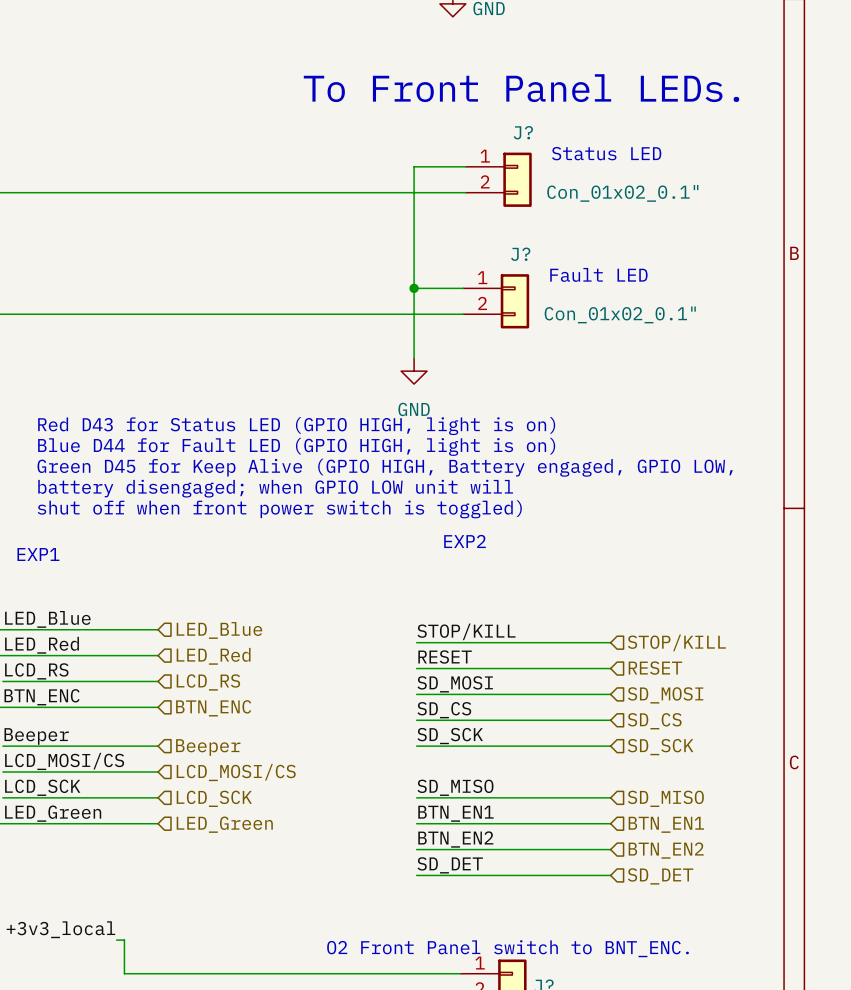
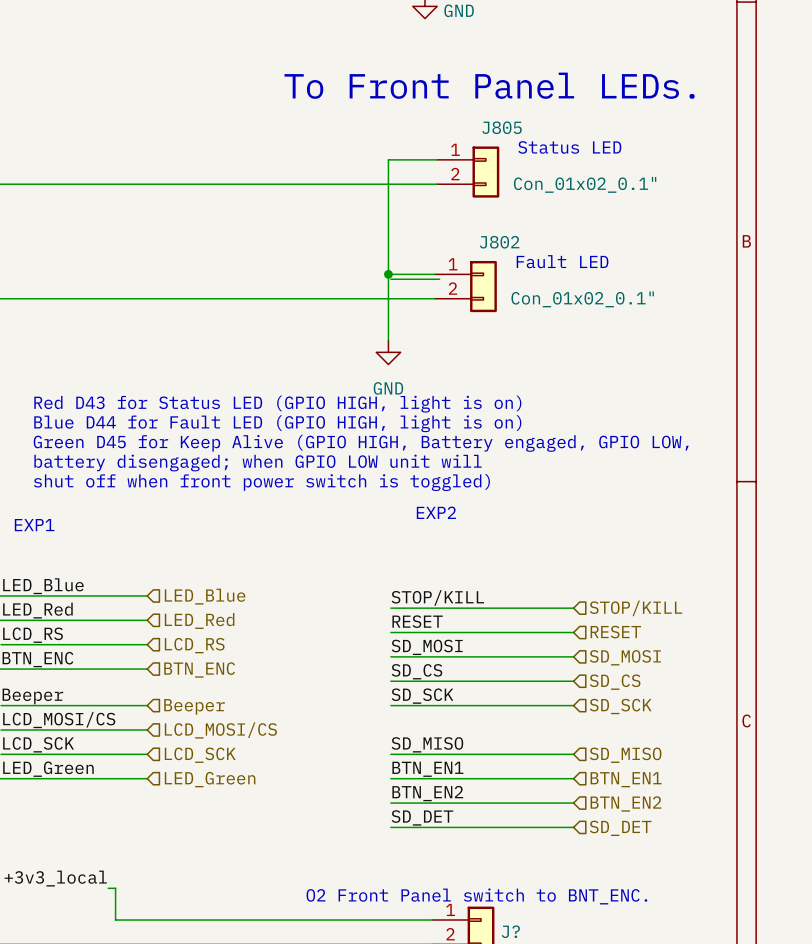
J? name: J? (523, 132) -> J805 (502, 127)
J? name: J? (520, 254) -> J802 (499, 242)
wire: none -> (390, 279) (439, 279)

